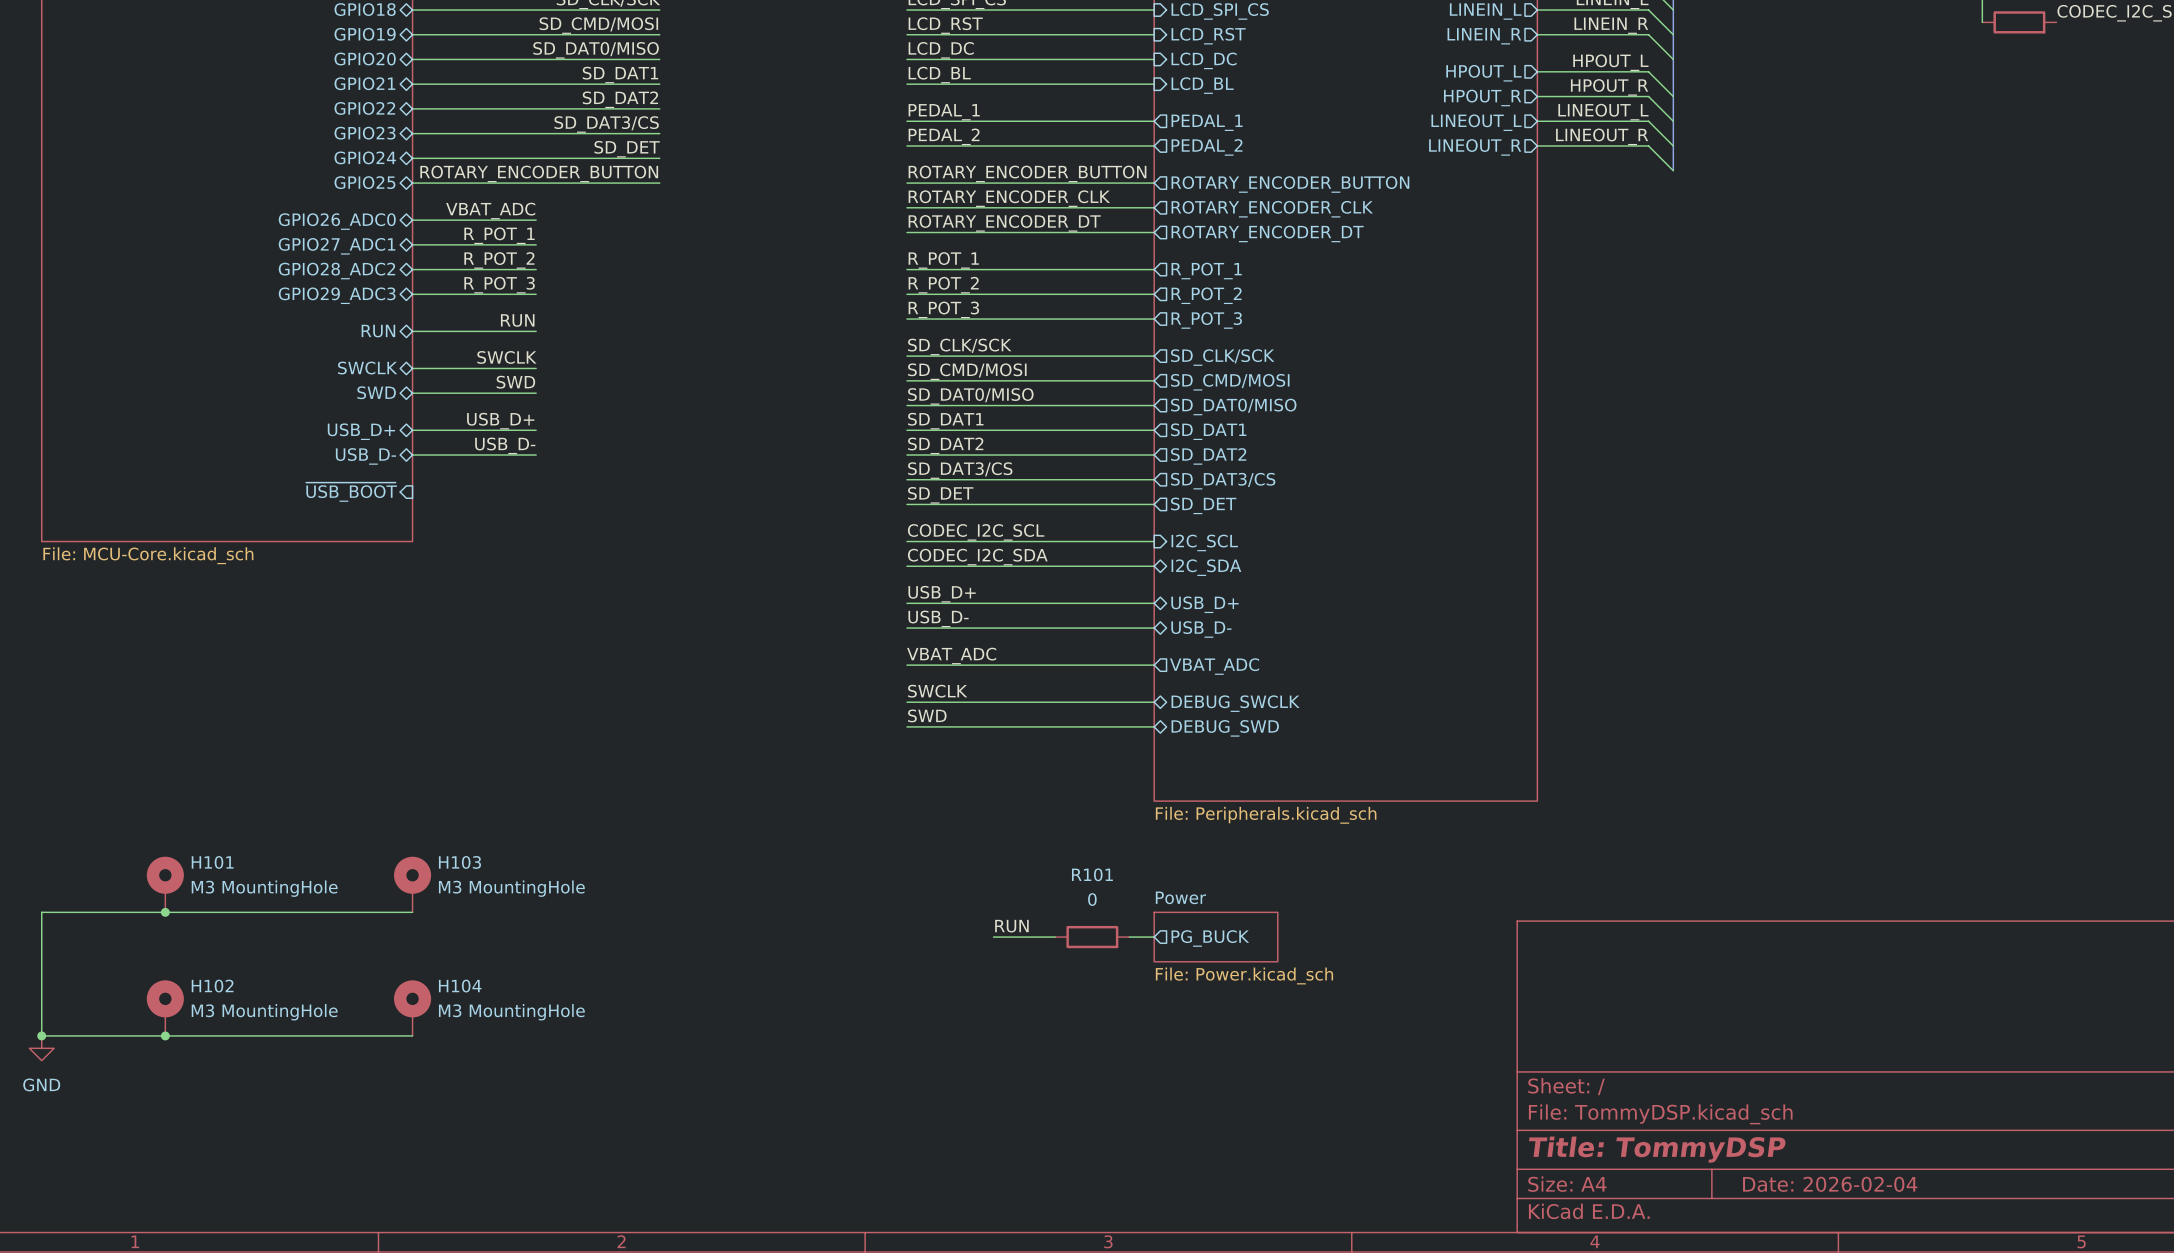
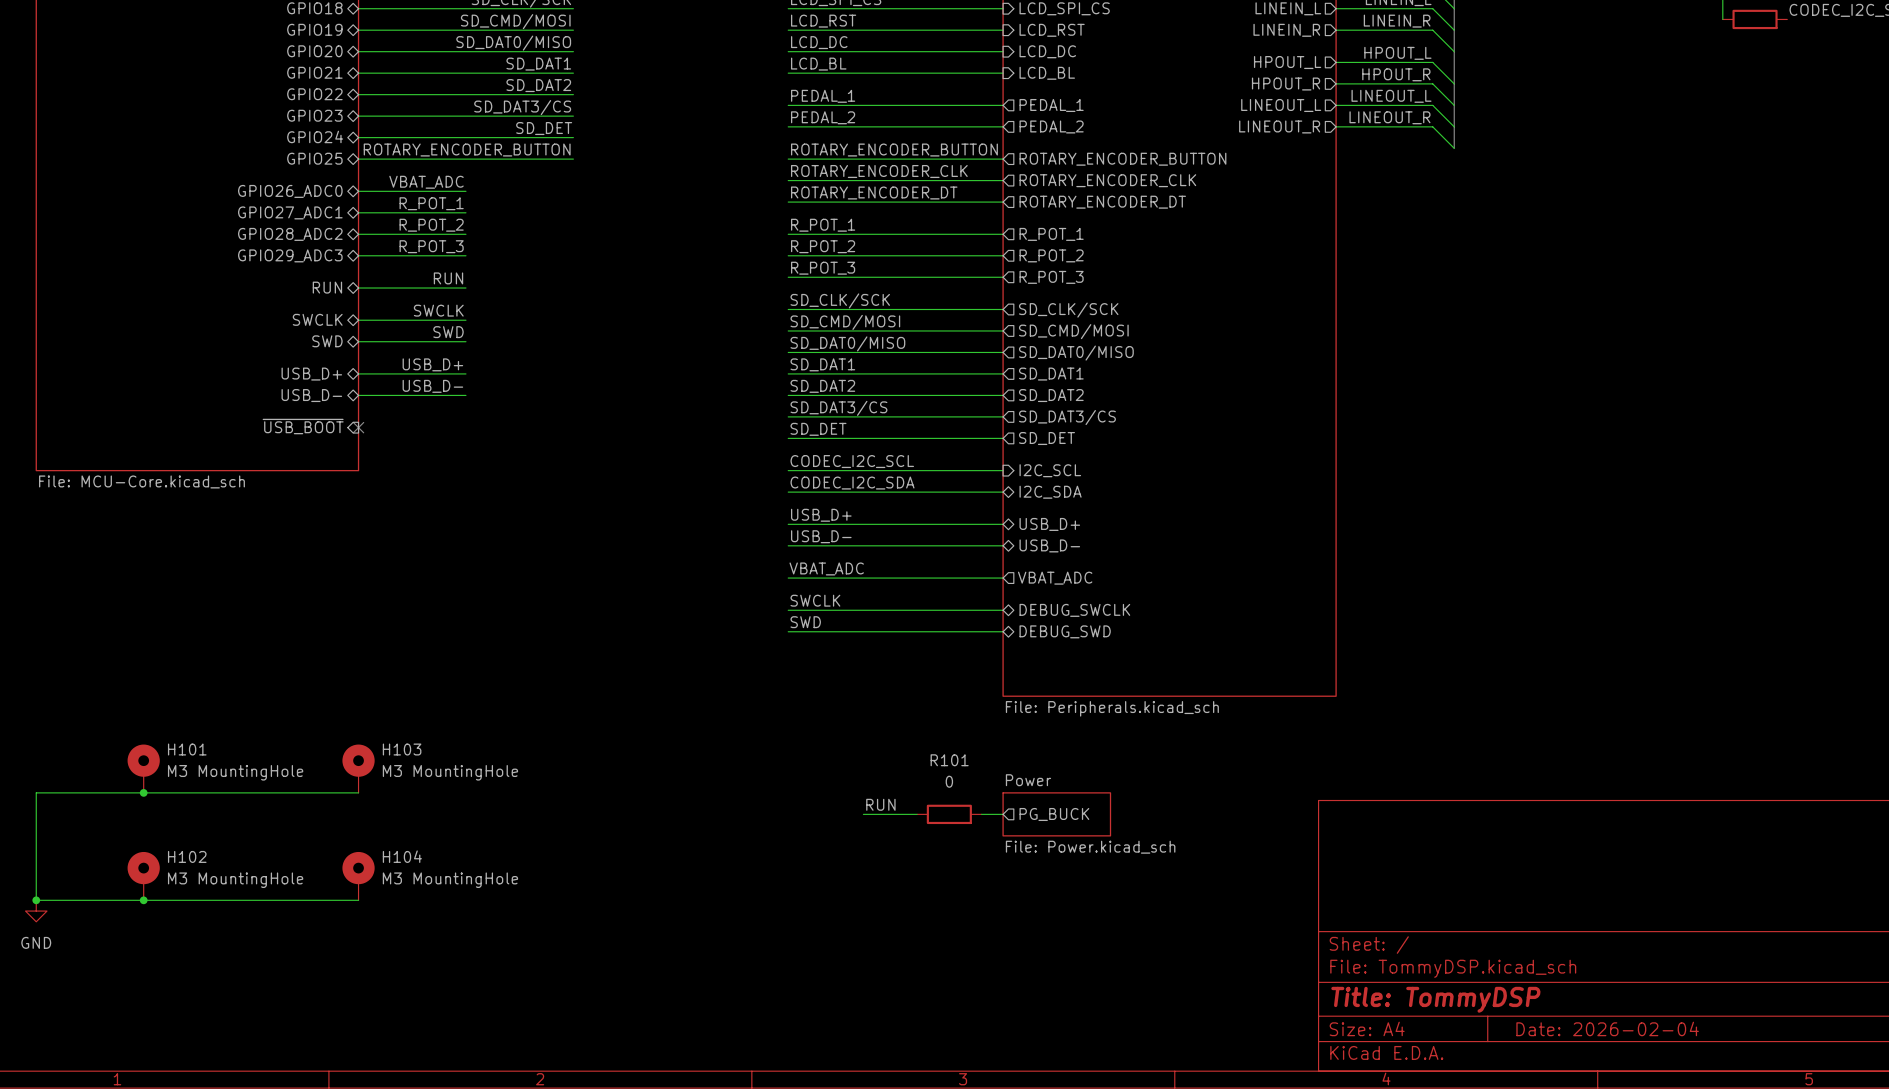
no-connect mark: none -> (358, 427)

